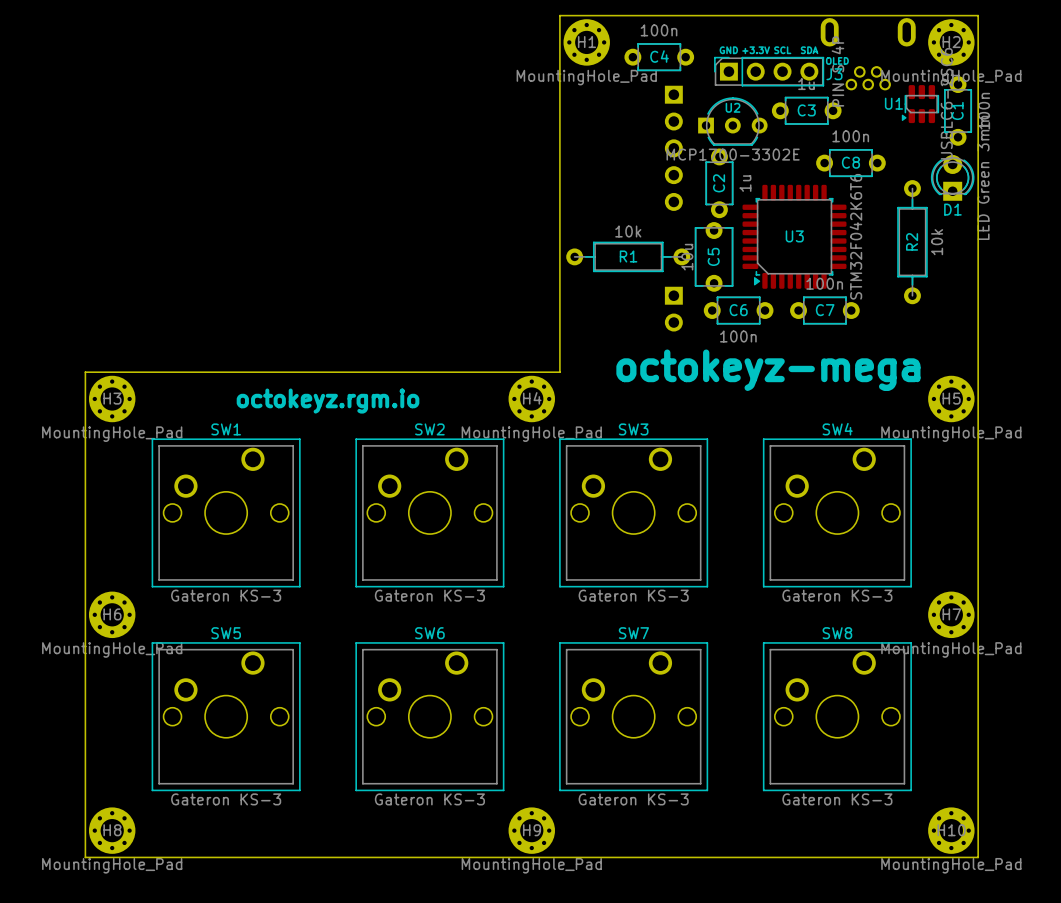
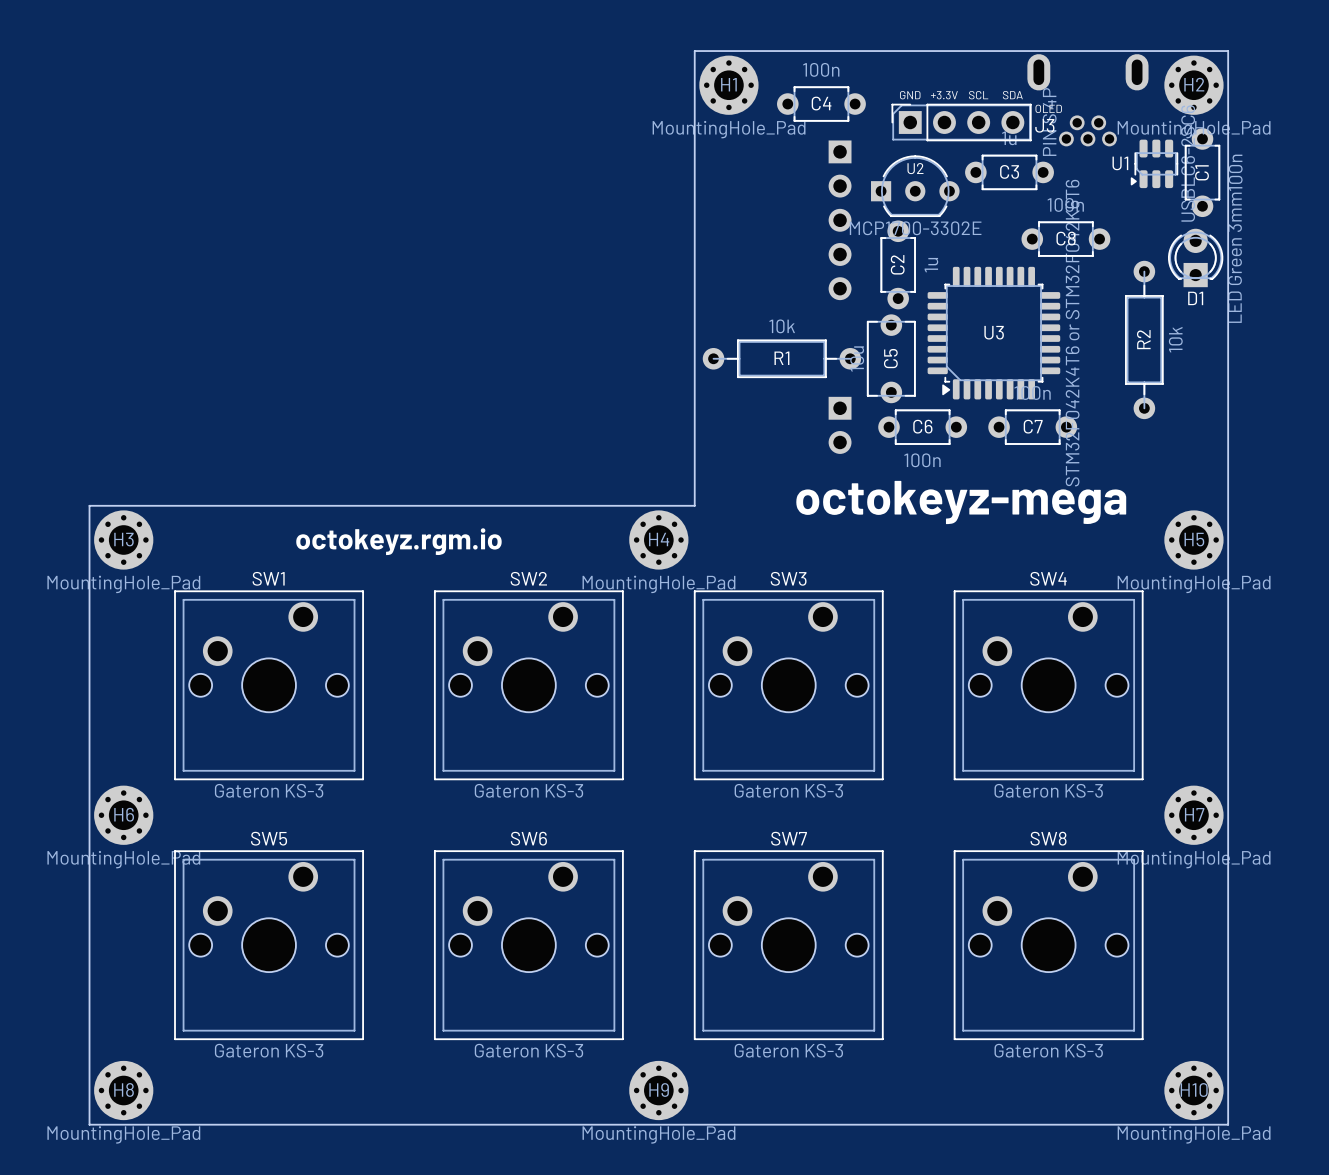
U3 value: STM32F042K6T6 (855, 236) -> STM32F042K4T6 or STM32F042K6T6 (1072, 333)

